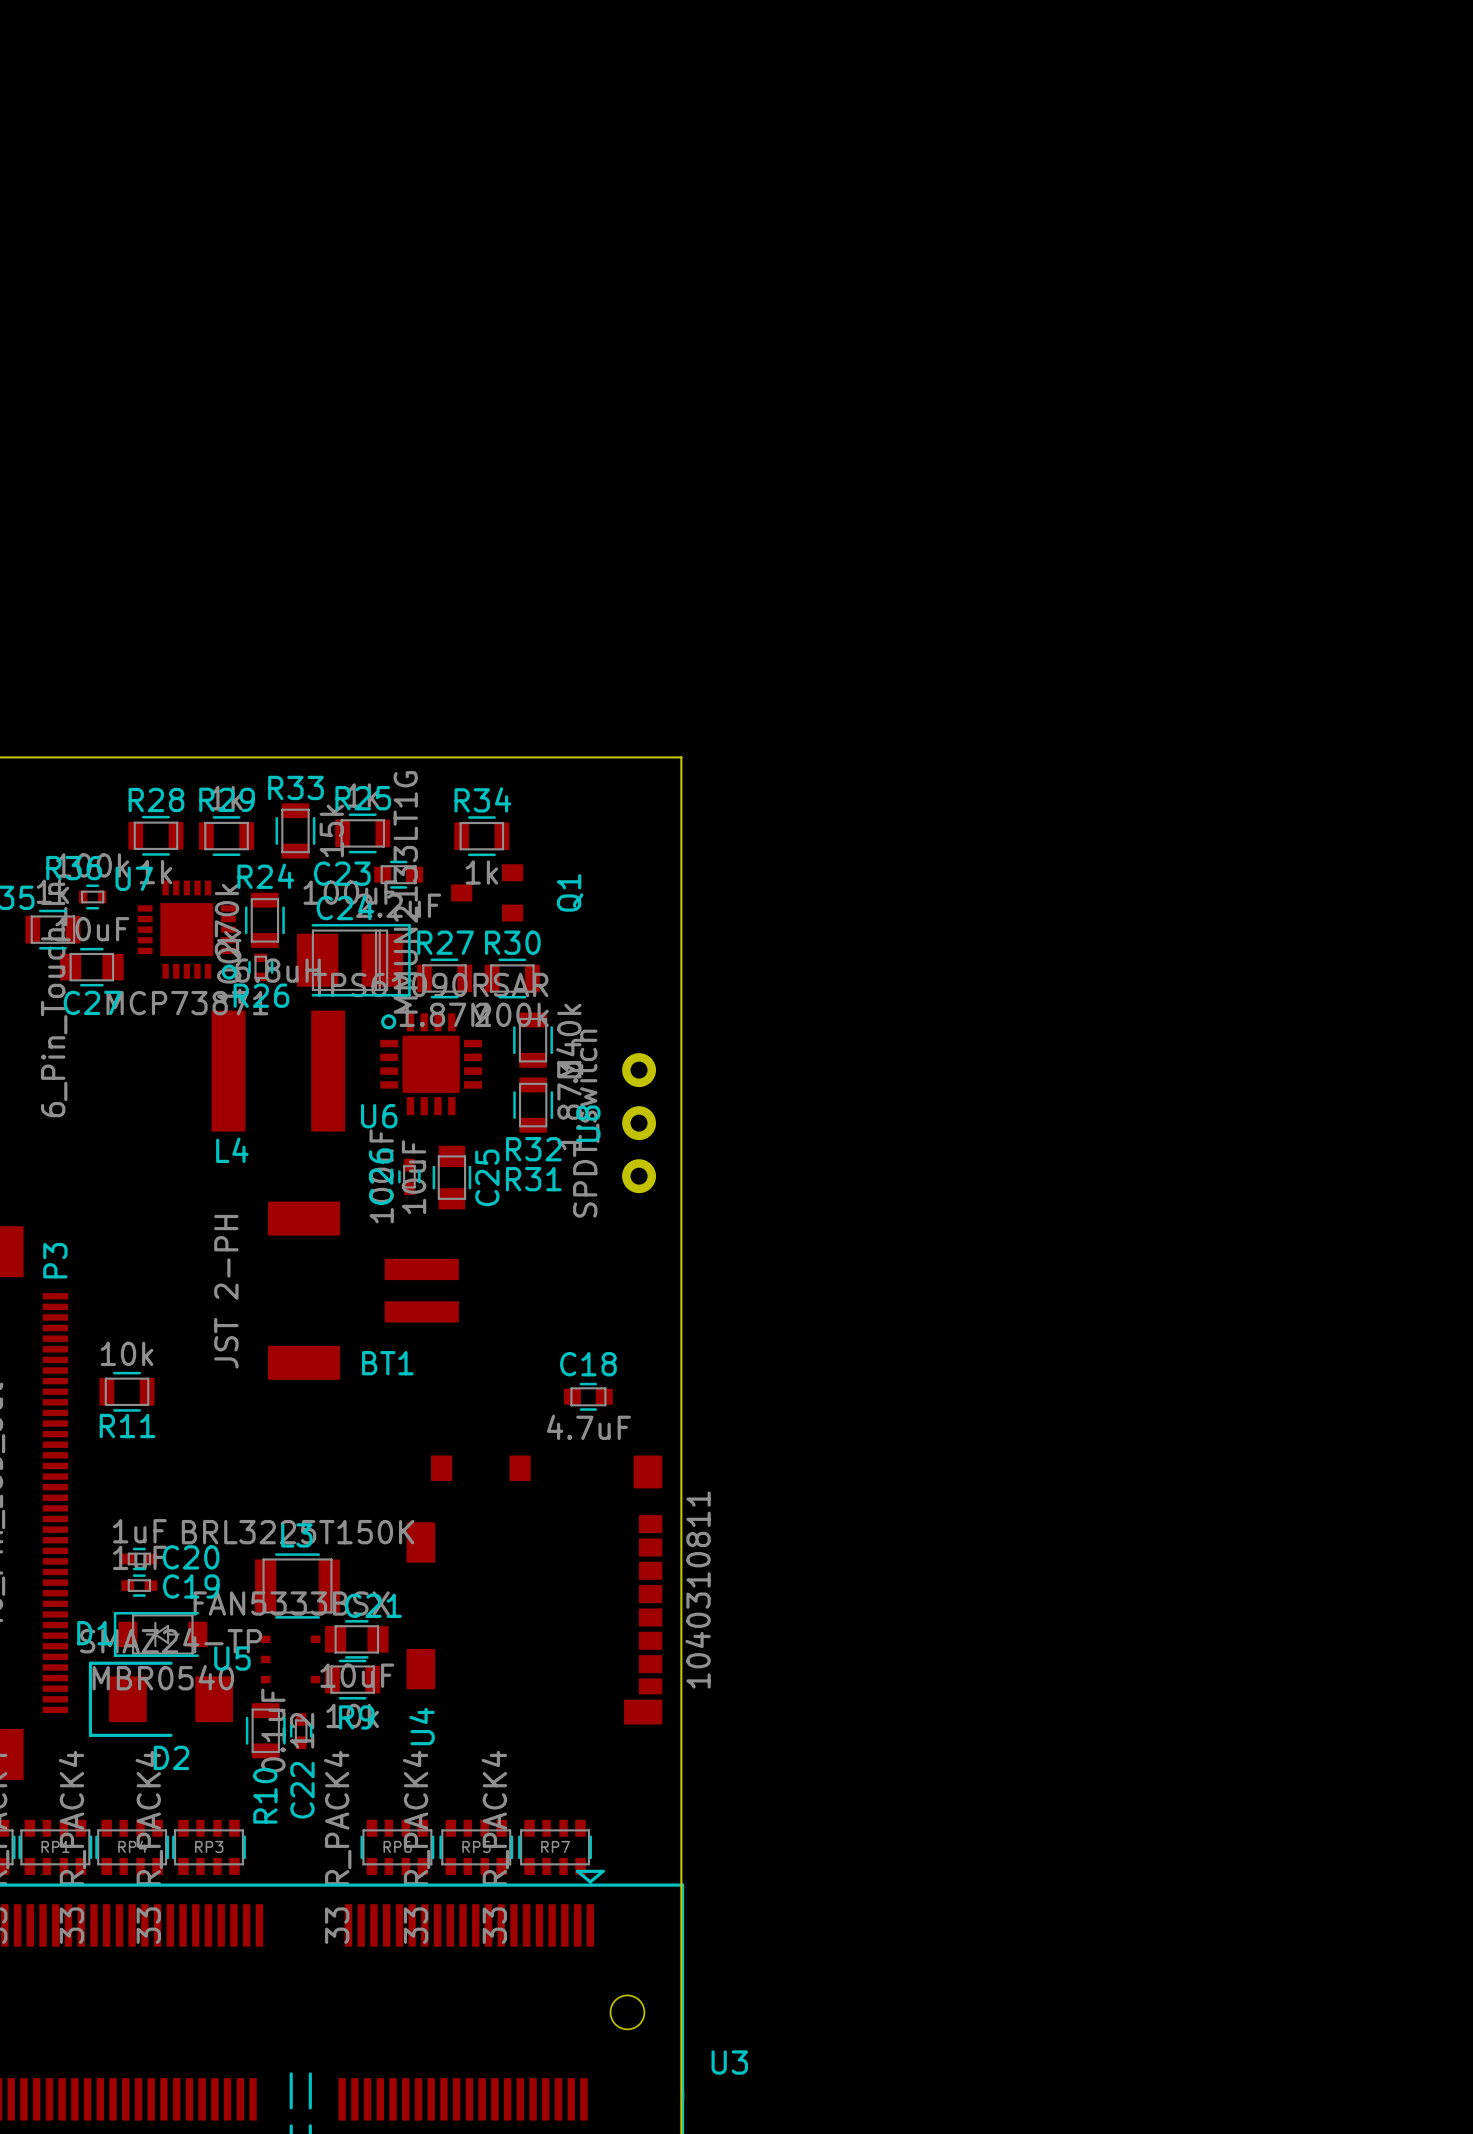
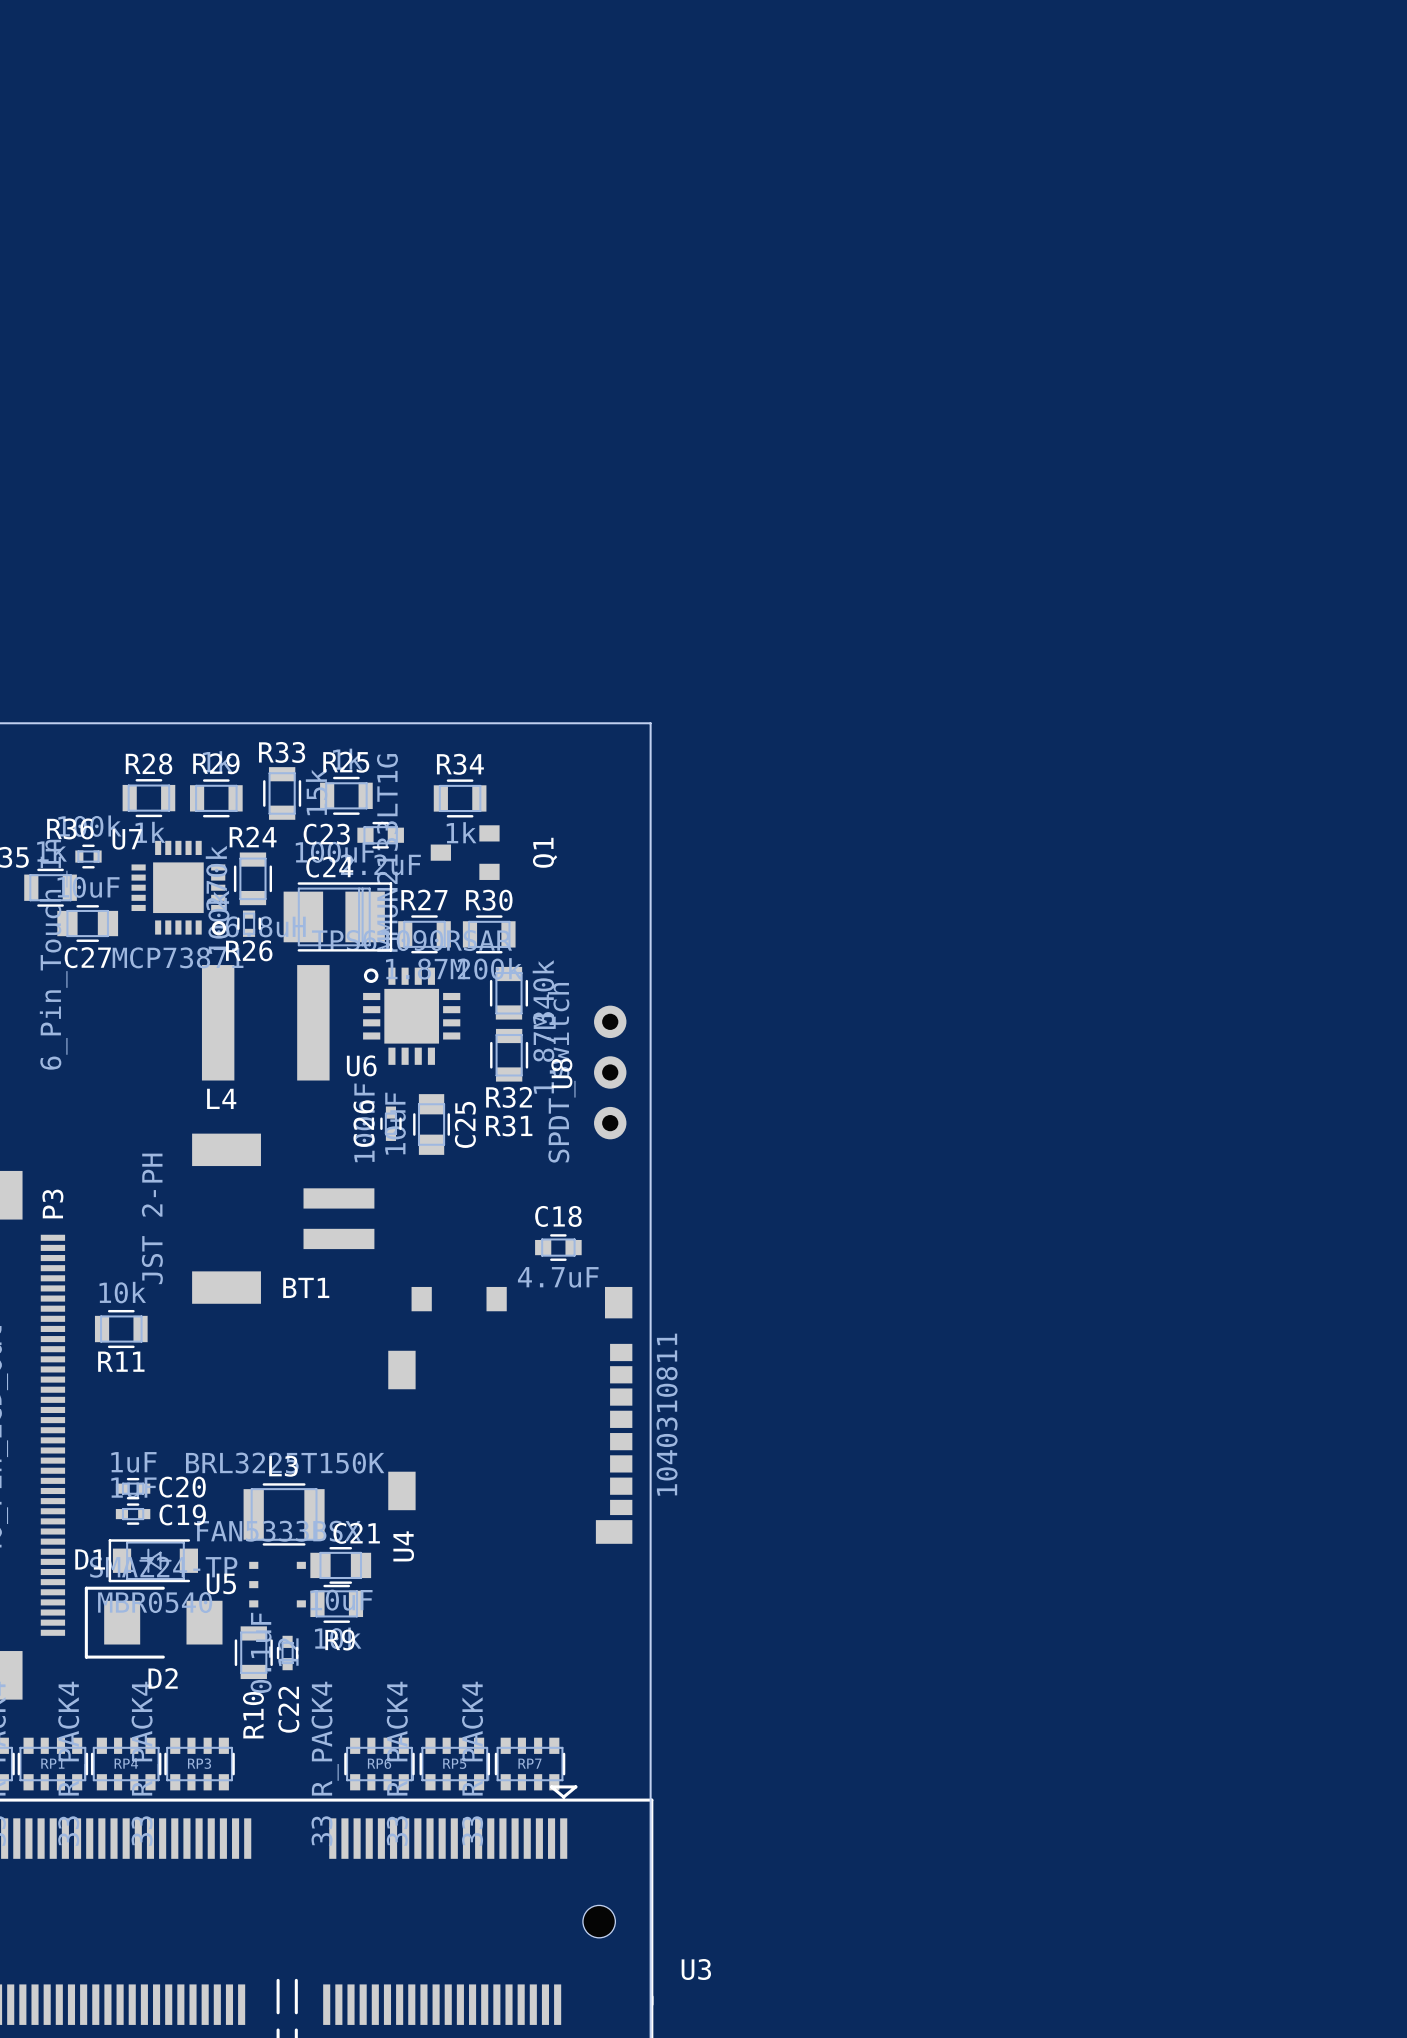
BT1 position: (363, 1290) -> (283, 1218)
C18 position: (588, 1396) -> (558, 1247)
U4 position: (534, 1590) -> (510, 1415)

